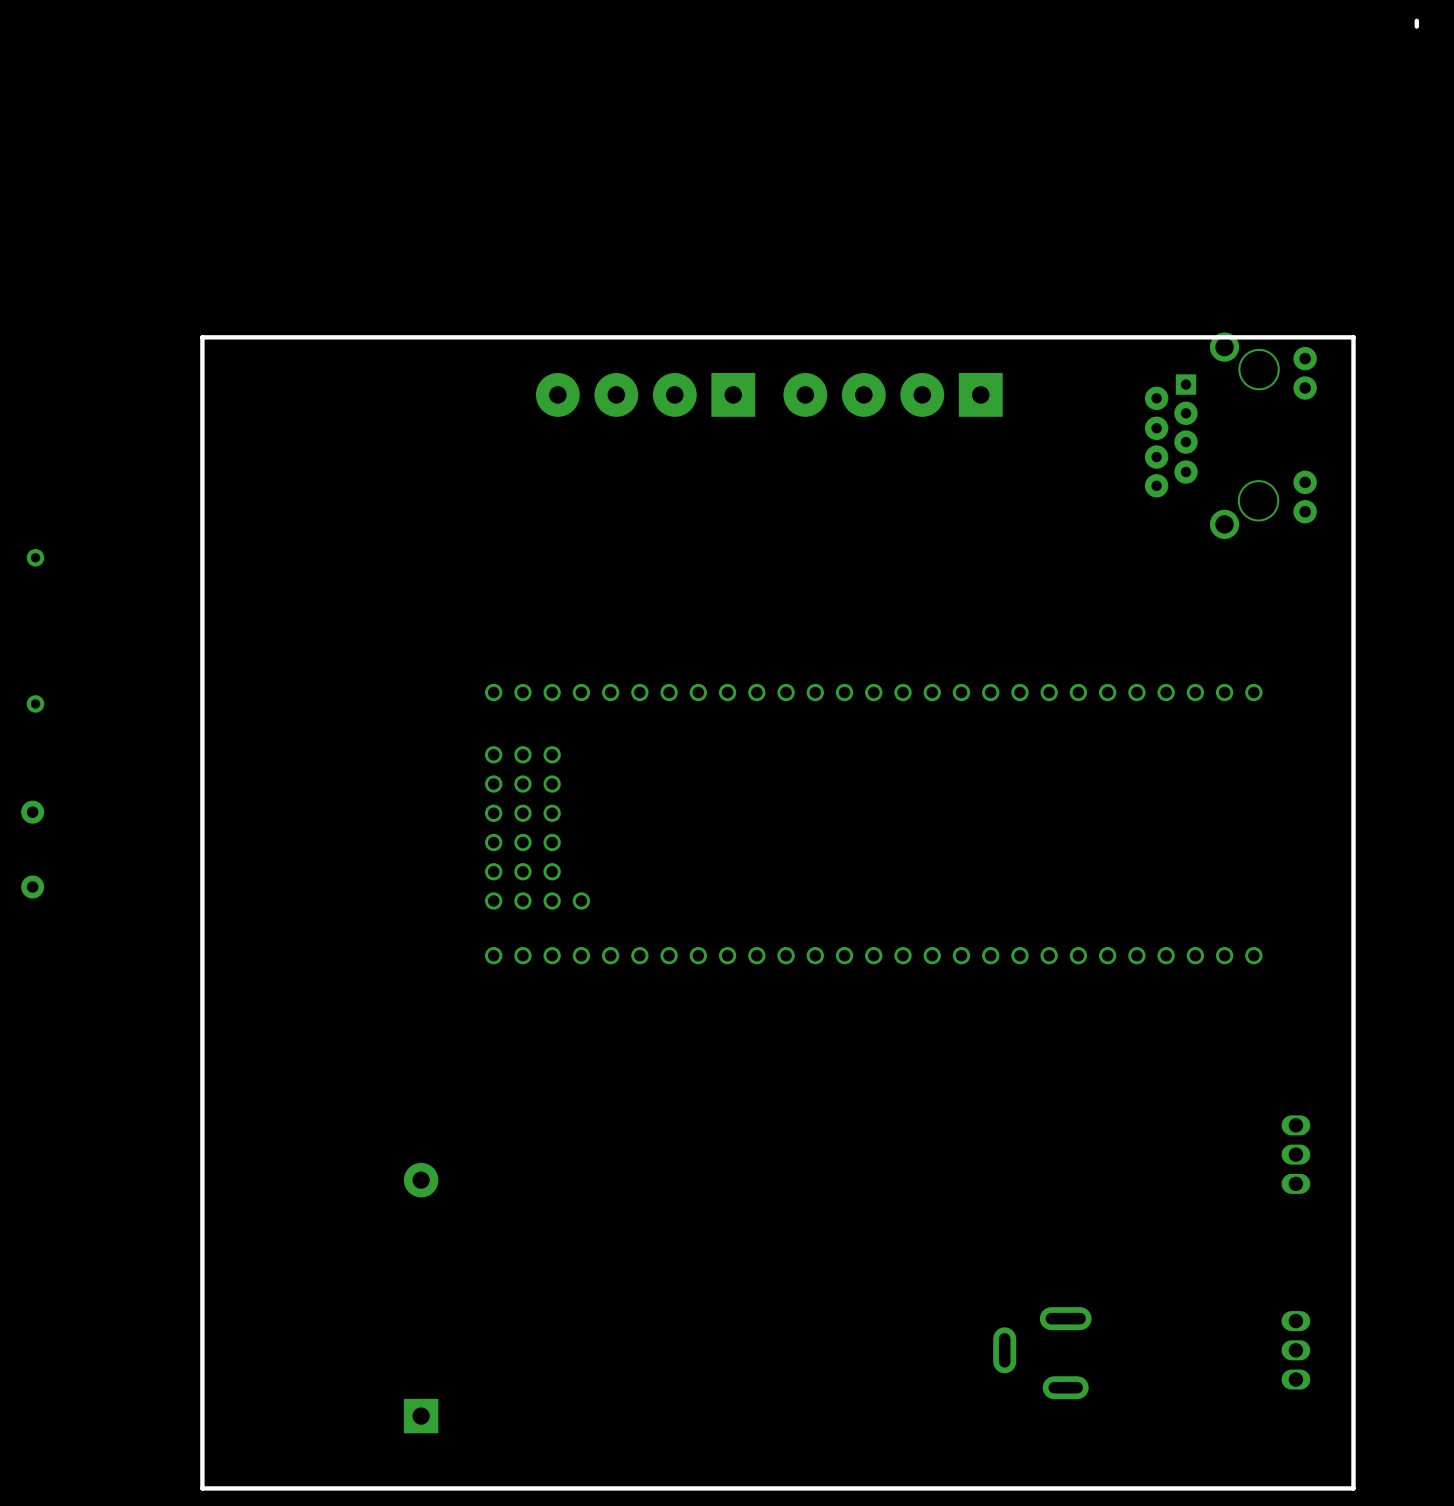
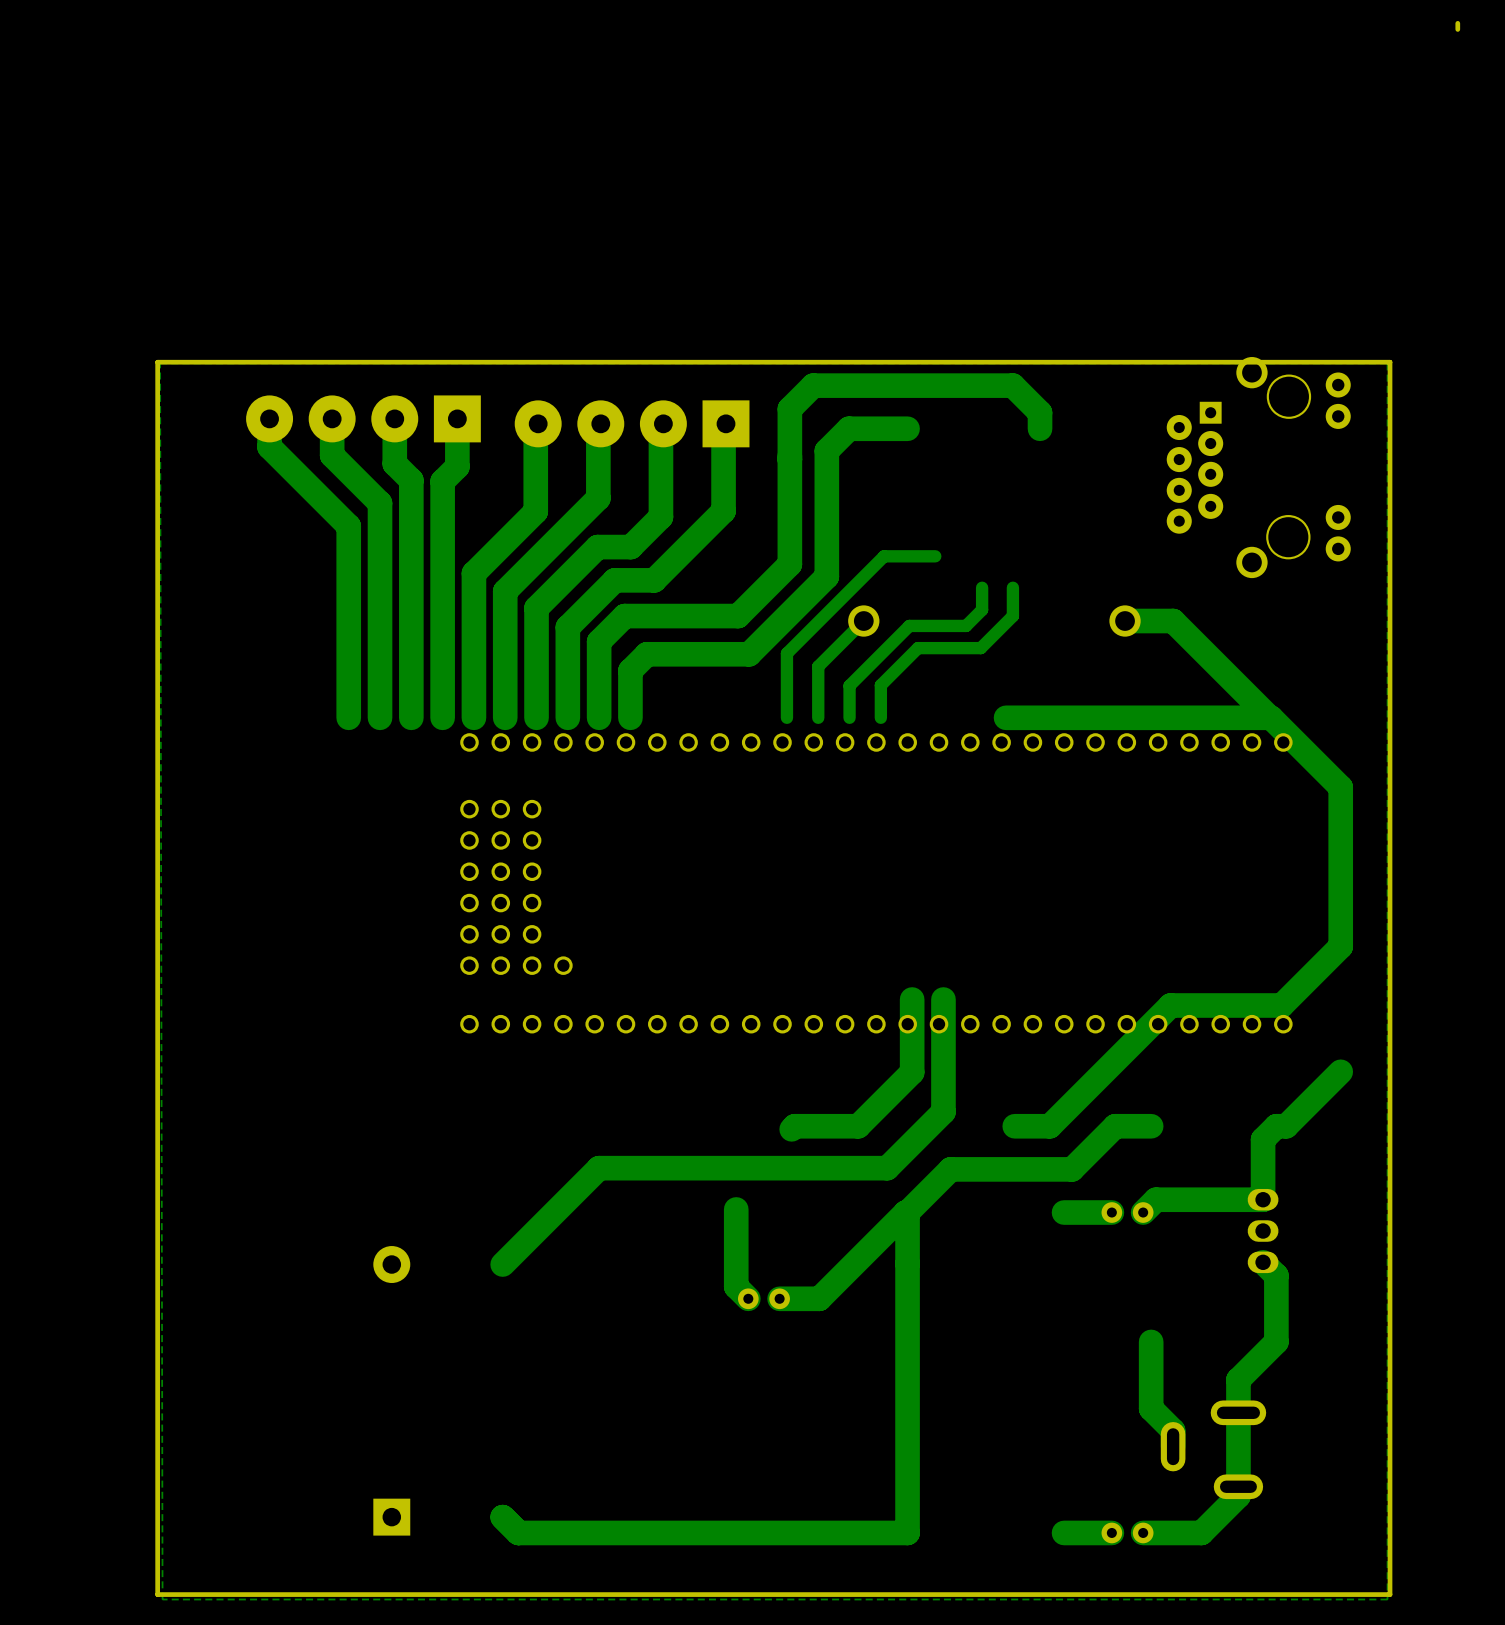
bottom zone outline: none -> (1387, 363) (160, 363) (162, 1599) (1387, 1599) (1387, 363)
bottom track: none -> (269, 418) (269, 447) (348, 526) (348, 717)
bottom track: none -> (332, 418) (332, 455) (380, 503) (380, 717)
part: none -> (363, 418)
bottom track: none -> (394, 418) (394, 463) (411, 480) (411, 717)
bottom track: none -> (457, 418) (457, 466) (442, 481) (442, 717)
bottom track: none -> (535, 418) (535, 511) (473, 573) (473, 717)
bottom track: none -> (598, 418) (598, 498) (505, 591) (505, 717)
bottom track: none -> (660, 418) (660, 516) (630, 547) (597, 547) (536, 608) (536, 717)
bottom track: none -> (723, 418) (723, 511) (654, 580) (614, 580) (567, 627) (567, 717)
part: (893, 394) -> none
bottom track: none -> (907, 428) (848, 428) (826, 450) (826, 576) (749, 654) (646, 654) (630, 670) (630, 717)
bottom track: none -> (1040, 428) (1040, 412) (1012, 385) (813, 385) (789, 409) (789, 564) (738, 616) (624, 616) (599, 641) (599, 717)
bottom track: none -> (935, 556) (884, 556) (786, 653) (786, 717)
bottom track: none -> (982, 587) (982, 609) (966, 625) (909, 625) (849, 685) (849, 717)
bottom track: none -> (1012, 587) (1012, 616) (980, 648) (918, 648) (880, 685) (880, 717)
bottom track: none -> (863, 621) (818, 666) (818, 717)
part: none -> (863, 621)
bottom track: none -> (1125, 621) (1173, 621) (1269, 717)
part: none -> (1125, 621)
bottom track: none -> (1006, 717) (1271, 717) (1340, 787) (1340, 946) (1281, 1005) (1170, 1005) (1049, 1126) (1014, 1126)
bottom track: none -> (912, 999) (912, 1072) (858, 1126) (794, 1126) (791, 1129)
bottom track: none -> (943, 999) (943, 1111) (887, 1168) (599, 1168) (502, 1264)
bottom track: none -> (1340, 1071) (1286, 1126) (1276, 1126) (1263, 1139) (1263, 1199) (1155, 1199) (1143, 1212)
bottom track: none -> (1151, 1126) (1115, 1126) (1072, 1169) (950, 1169) (907, 1212)
bottom track: none -> (736, 1209) (736, 1286) (748, 1298)
bottom track: none -> (907, 1212) (907, 1532) (518, 1532) (502, 1517)
bottom track: none -> (907, 1212) (819, 1298) (779, 1298)
bottom track: none -> (1111, 1212) (1064, 1212)
part: none -> (1127, 1212)
part position: (1295, 1154) -> (1263, 1231)
bottom track: none -> (1263, 1262) (1276, 1275) (1276, 1341) (1238, 1379) (1238, 1496) (1201, 1532) (1143, 1532)
part: none -> (763, 1298)
bottom track: none -> (1151, 1341) (1151, 1408) (1173, 1430) (1173, 1446)
part: (1295, 1350) -> none
part position: (1042, 1353) -> (1213, 1449)
bottom track: none -> (1111, 1532) (1064, 1532)
part: none -> (1127, 1532)

